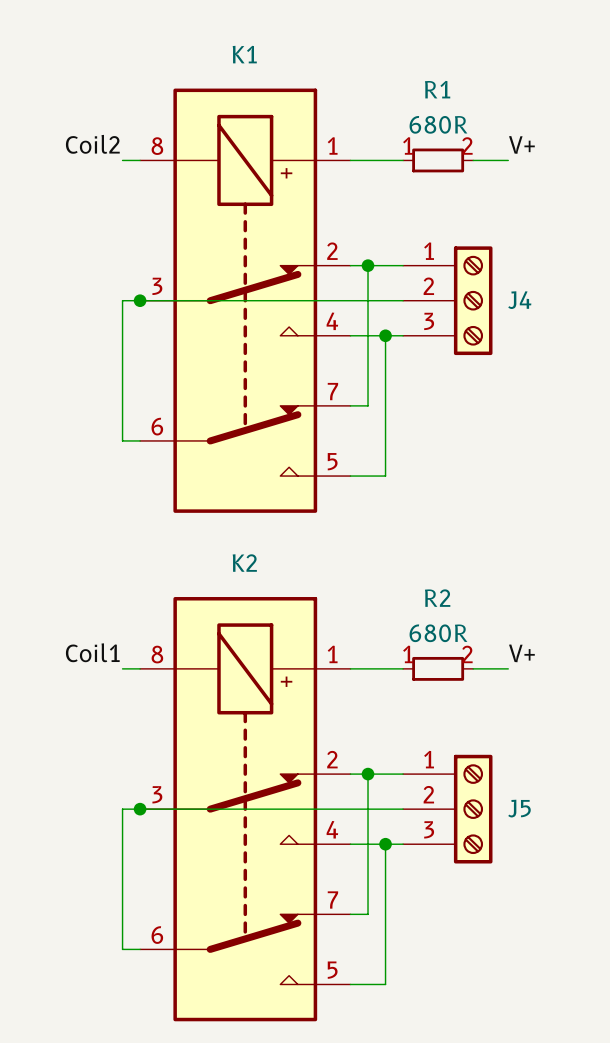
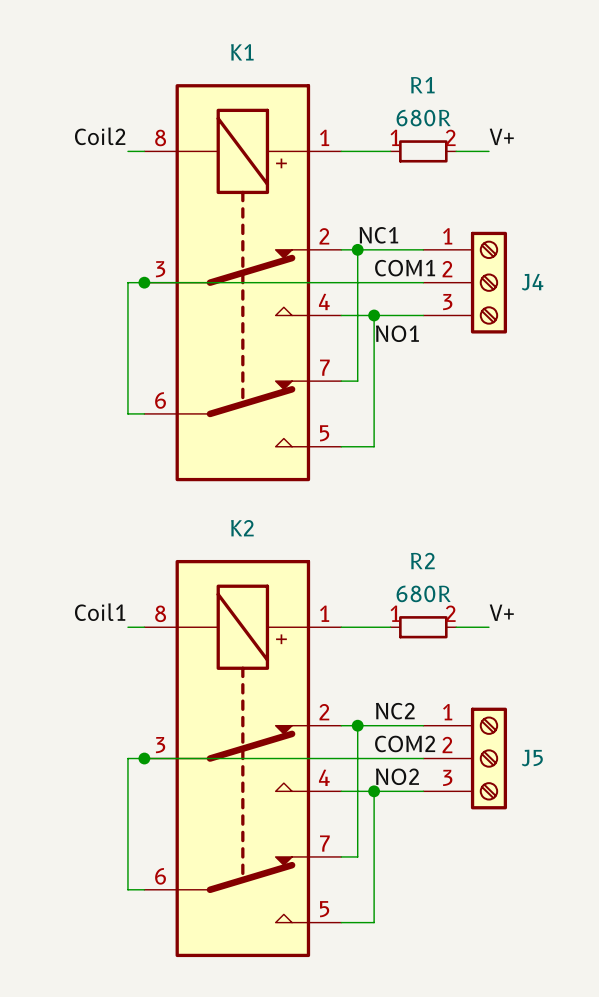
label: none -> NC1 (378, 235)
label: none -> COM1 (405, 268)
J4 position: (447, 300) -> (465, 282)
label: none -> NO1 (397, 333)
label: none -> NC2 (395, 711)
label: none -> COM2 (405, 743)
J5 position: (447, 809) -> (465, 758)
label: none -> NO2 (397, 776)

